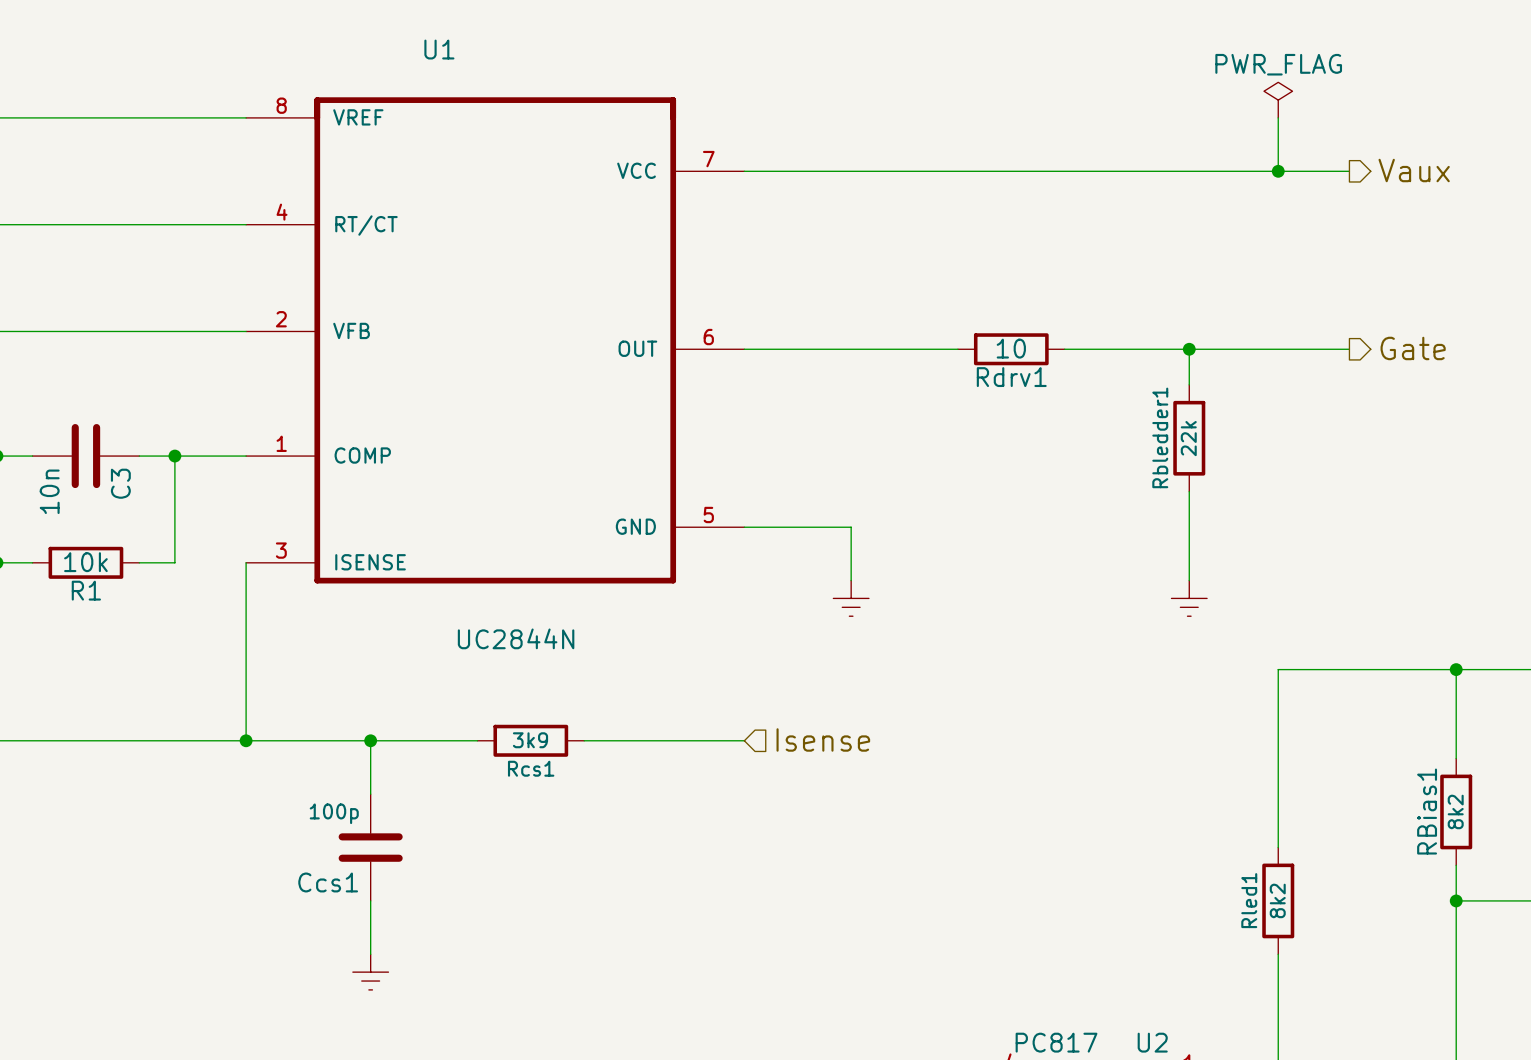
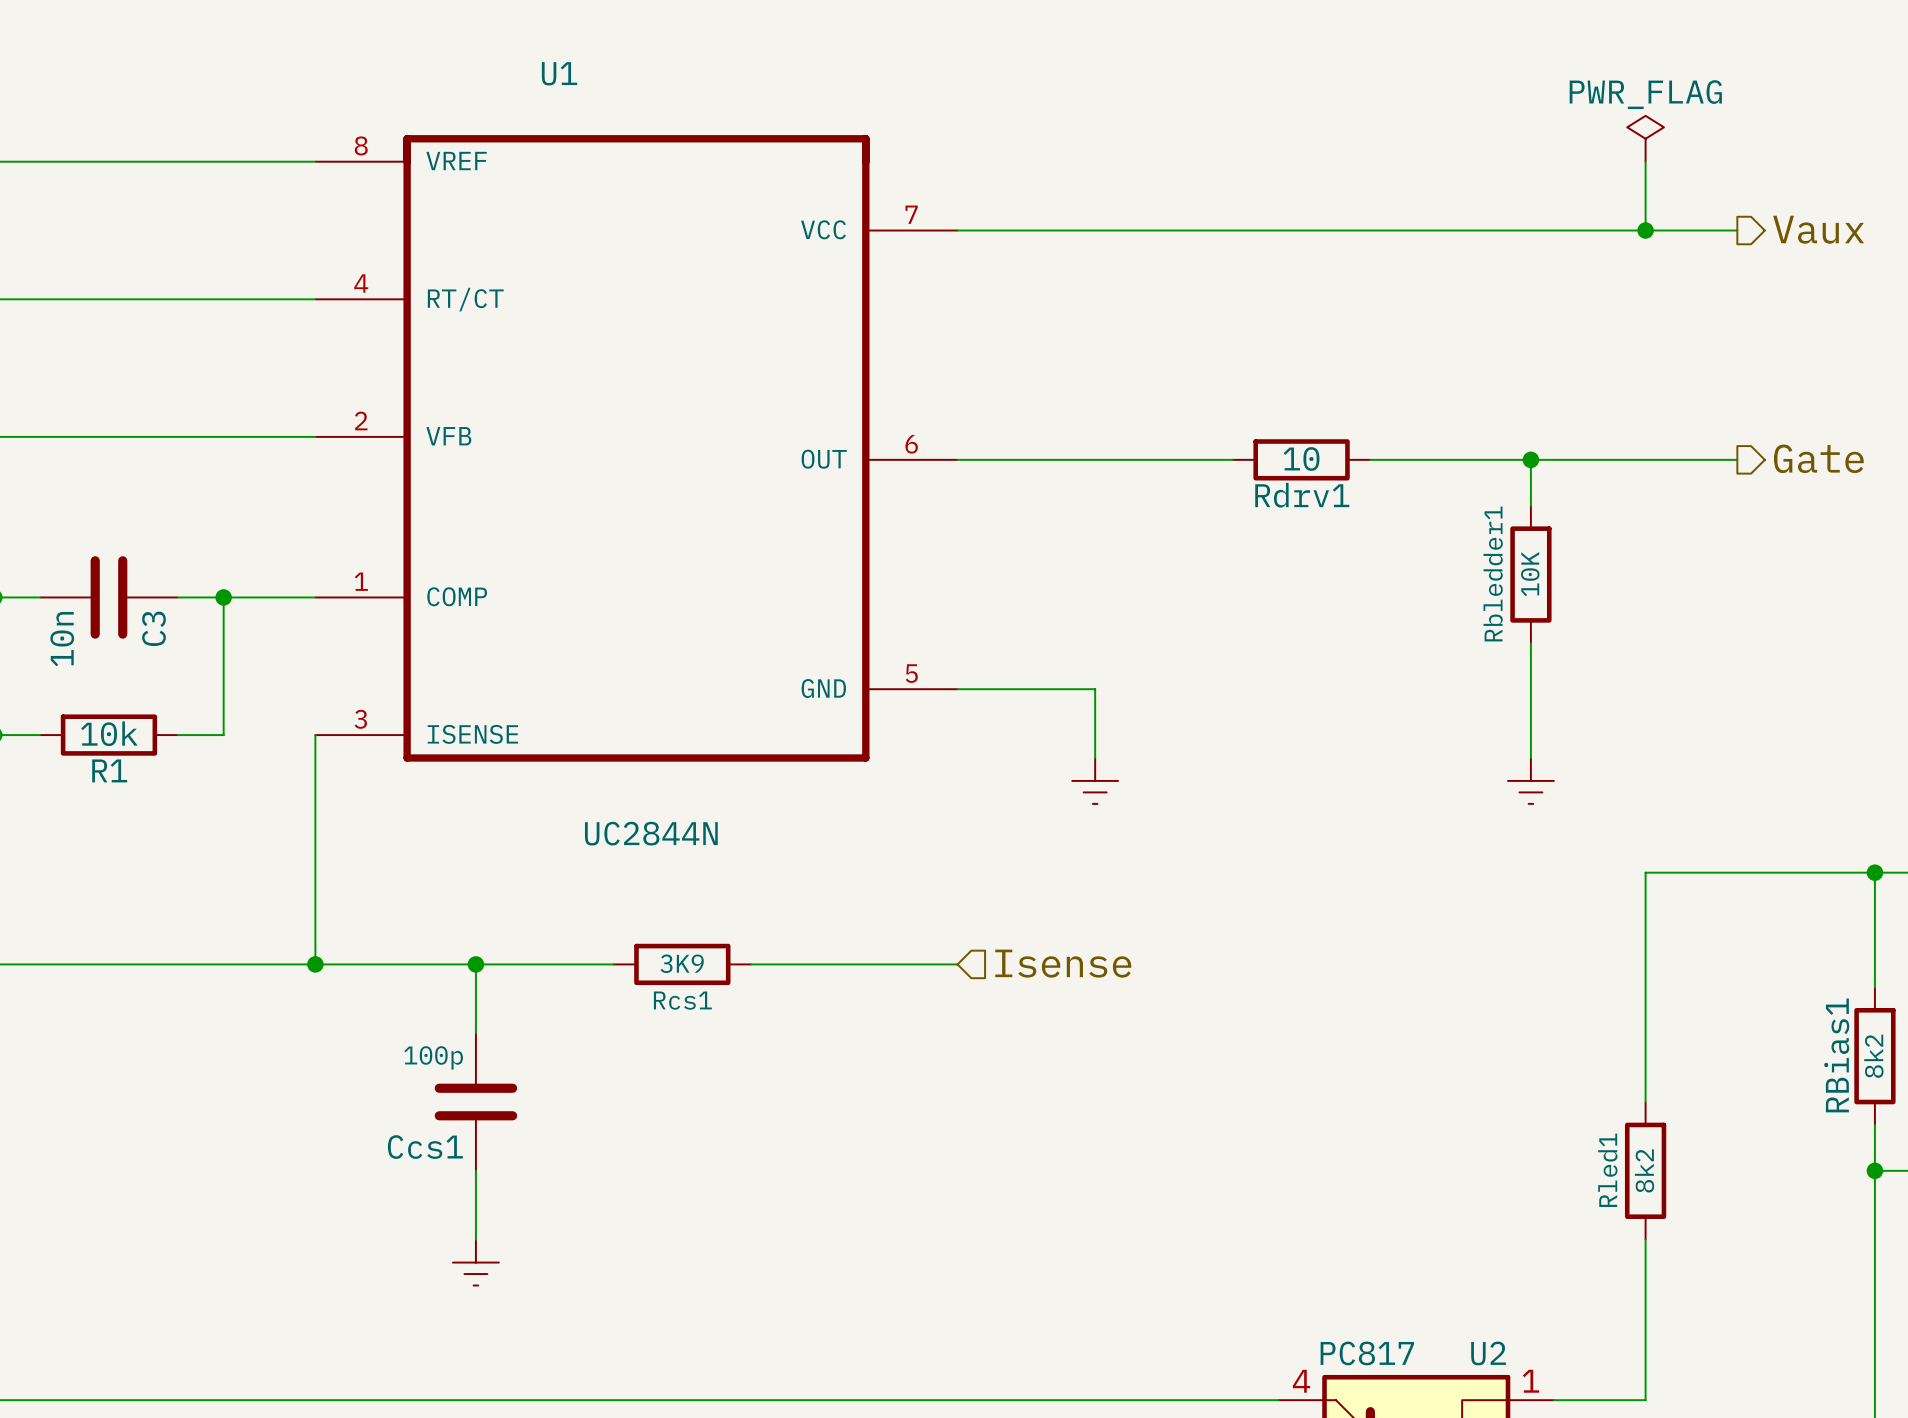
Rbledder1 value: 22k (1188, 438) -> 10K (1530, 574)
Rcs1 value: 3k9 (530, 740) -> 3K9 (682, 963)

